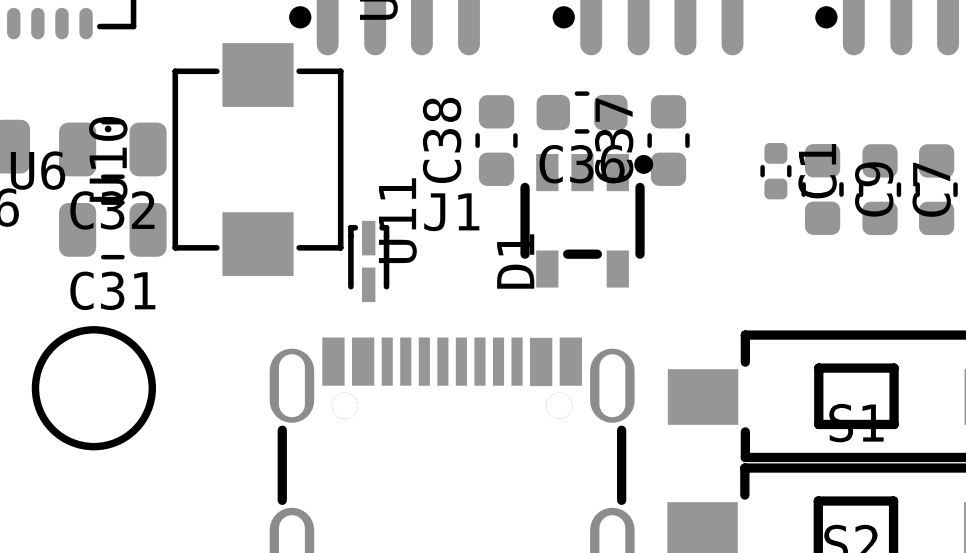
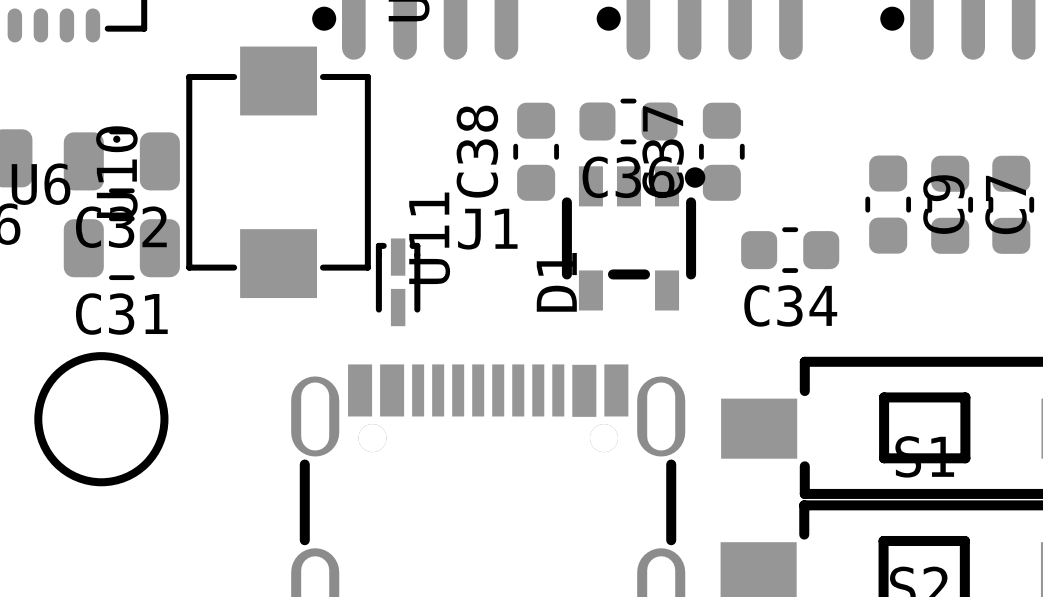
C1: (775, 171) -> none
C34: none -> (790, 250)

